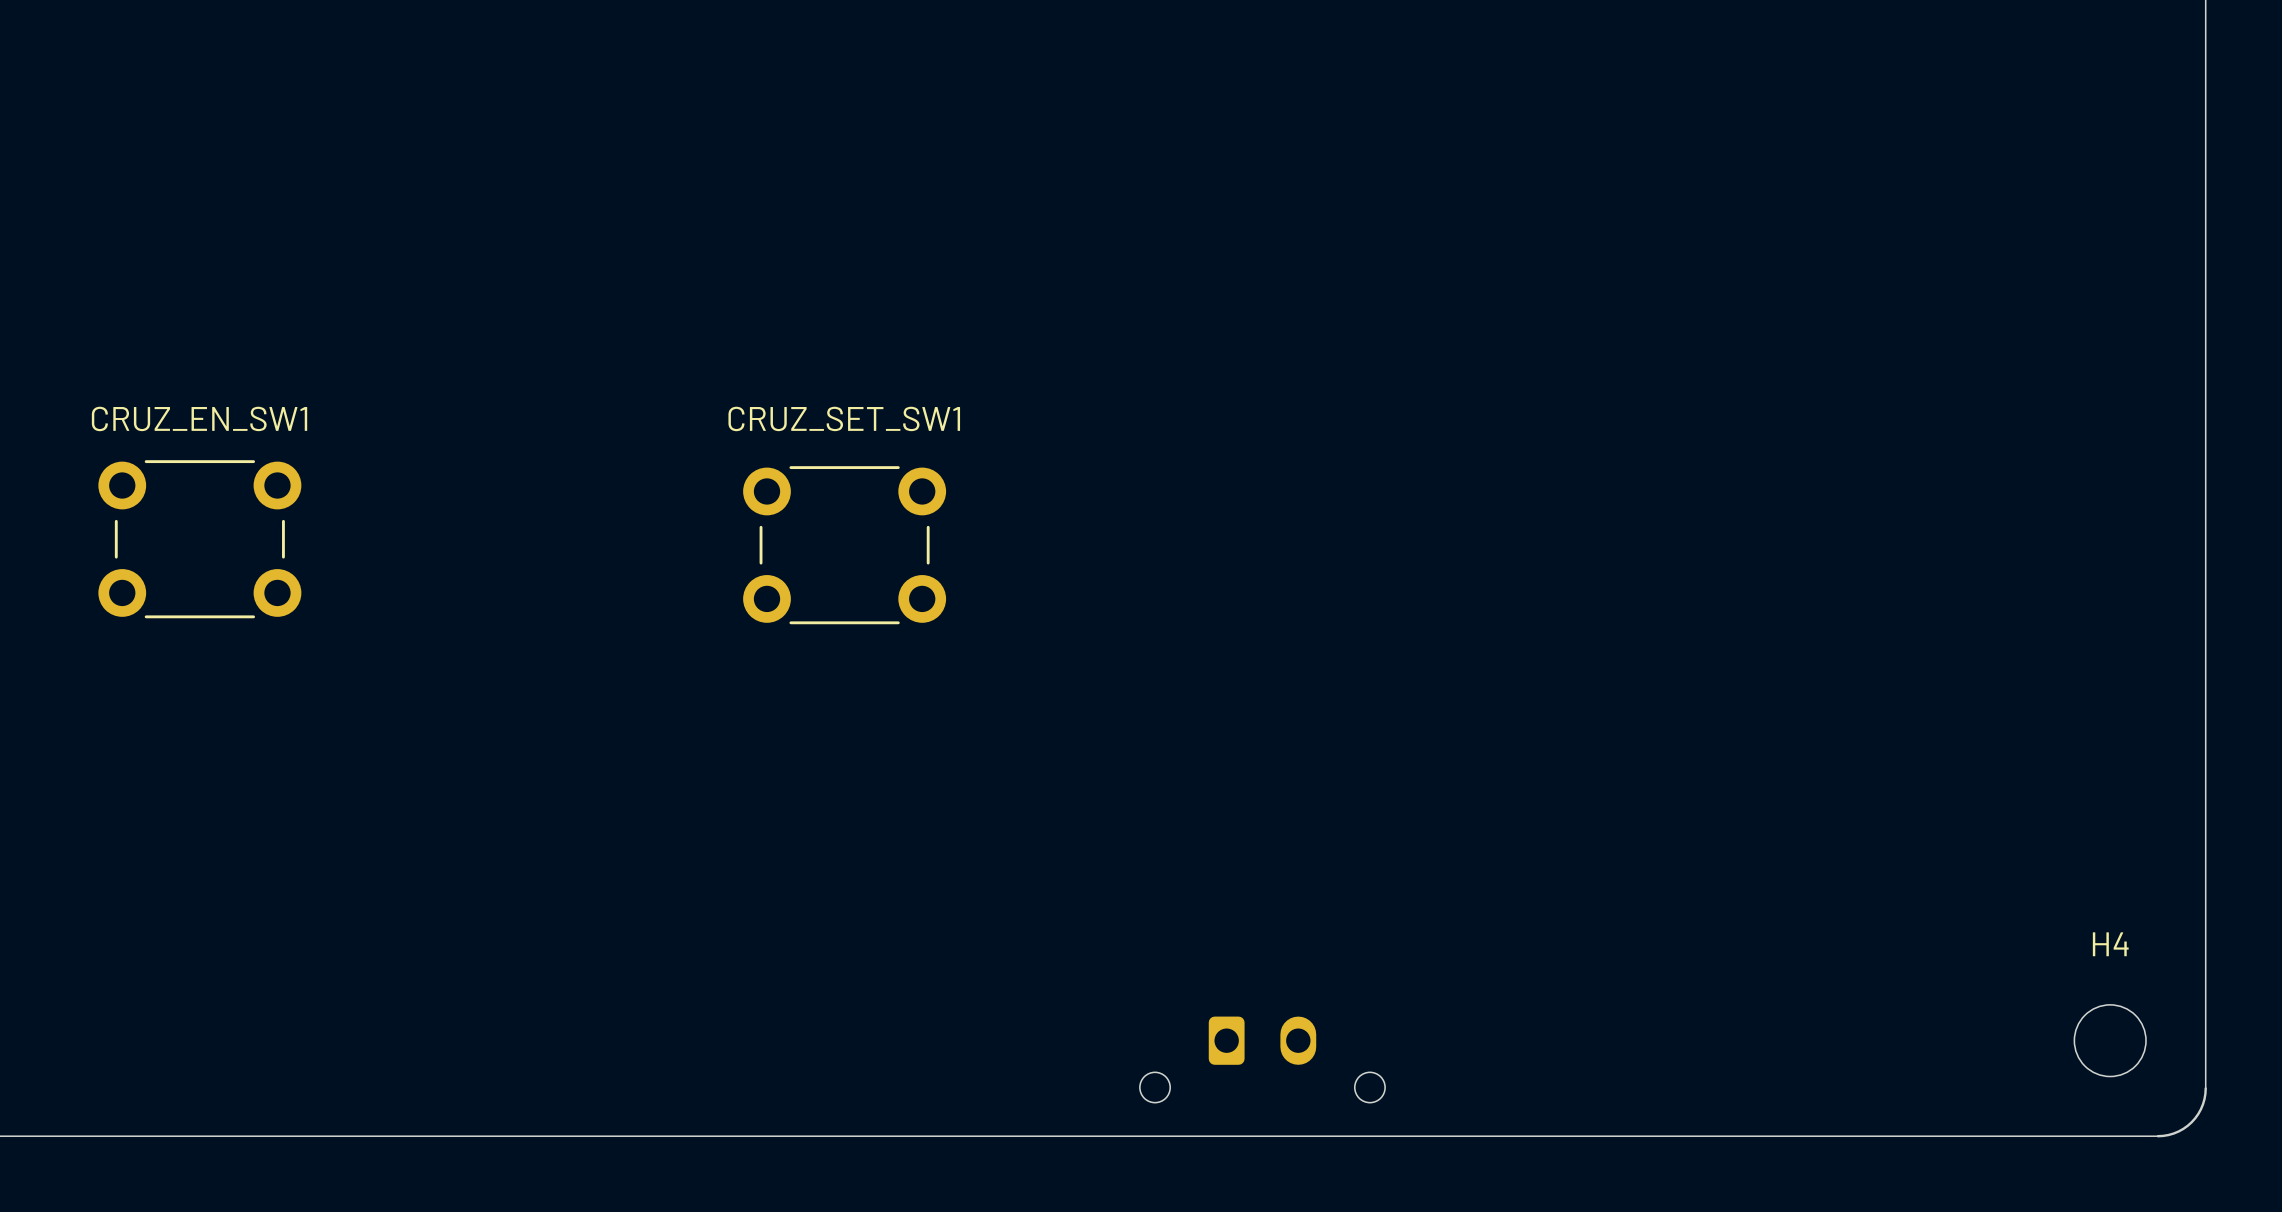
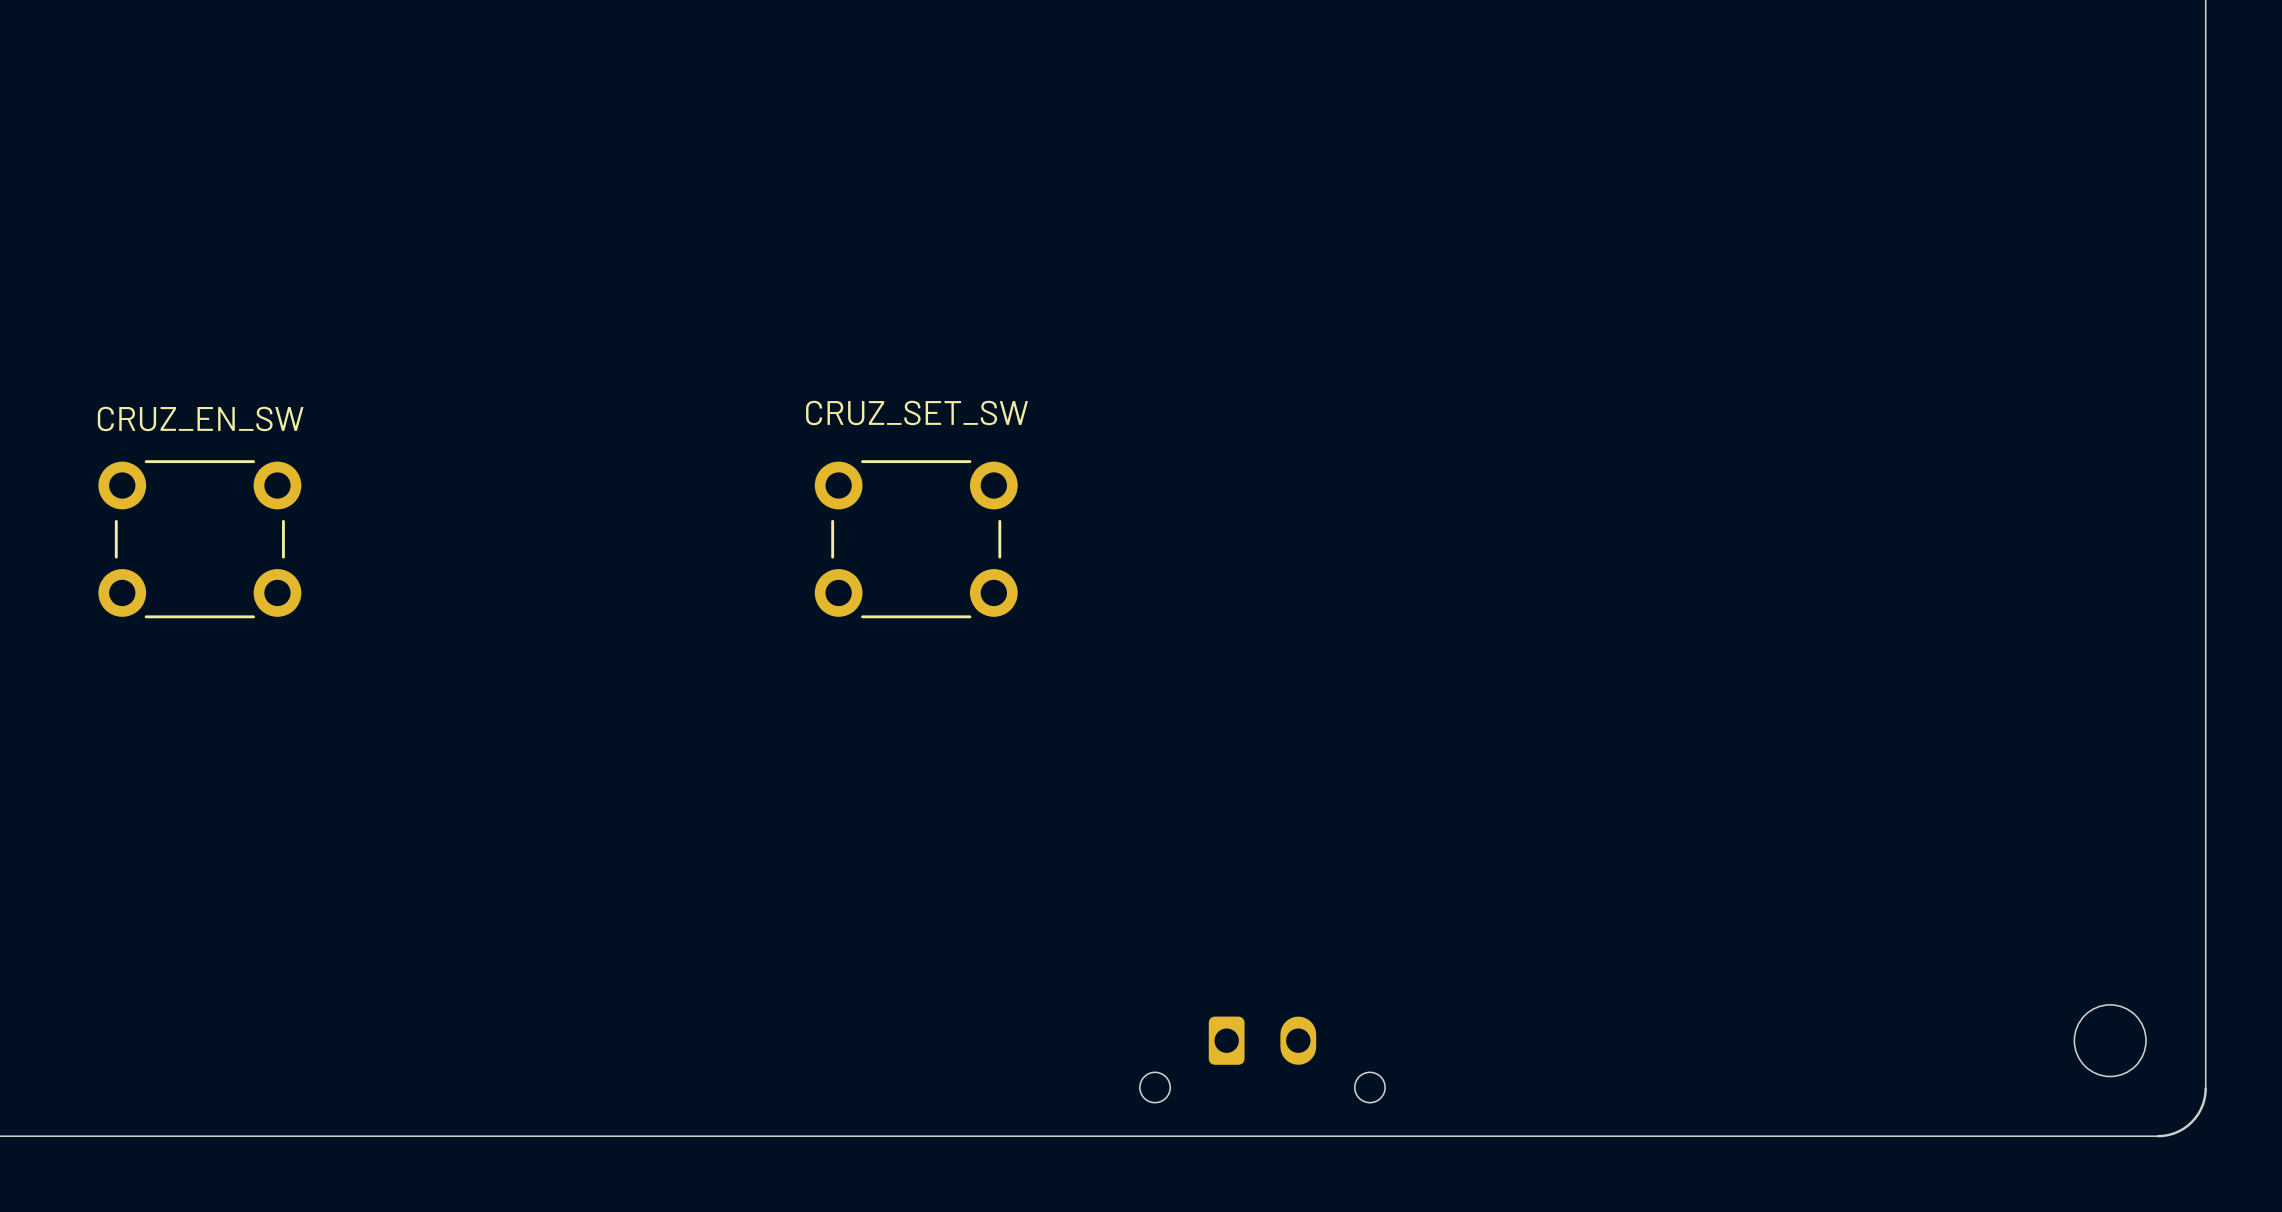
CRUZ_EN_SW1 name: CRUZ_EN_SW1 (199, 418) -> CRUZ_EN_SW (200, 418)
CRUZ_SET_SW: none -> (916, 539)
CRUZ_SET_SW1: (844, 545) -> none
H4 name: H4 (2110, 944) -> none

